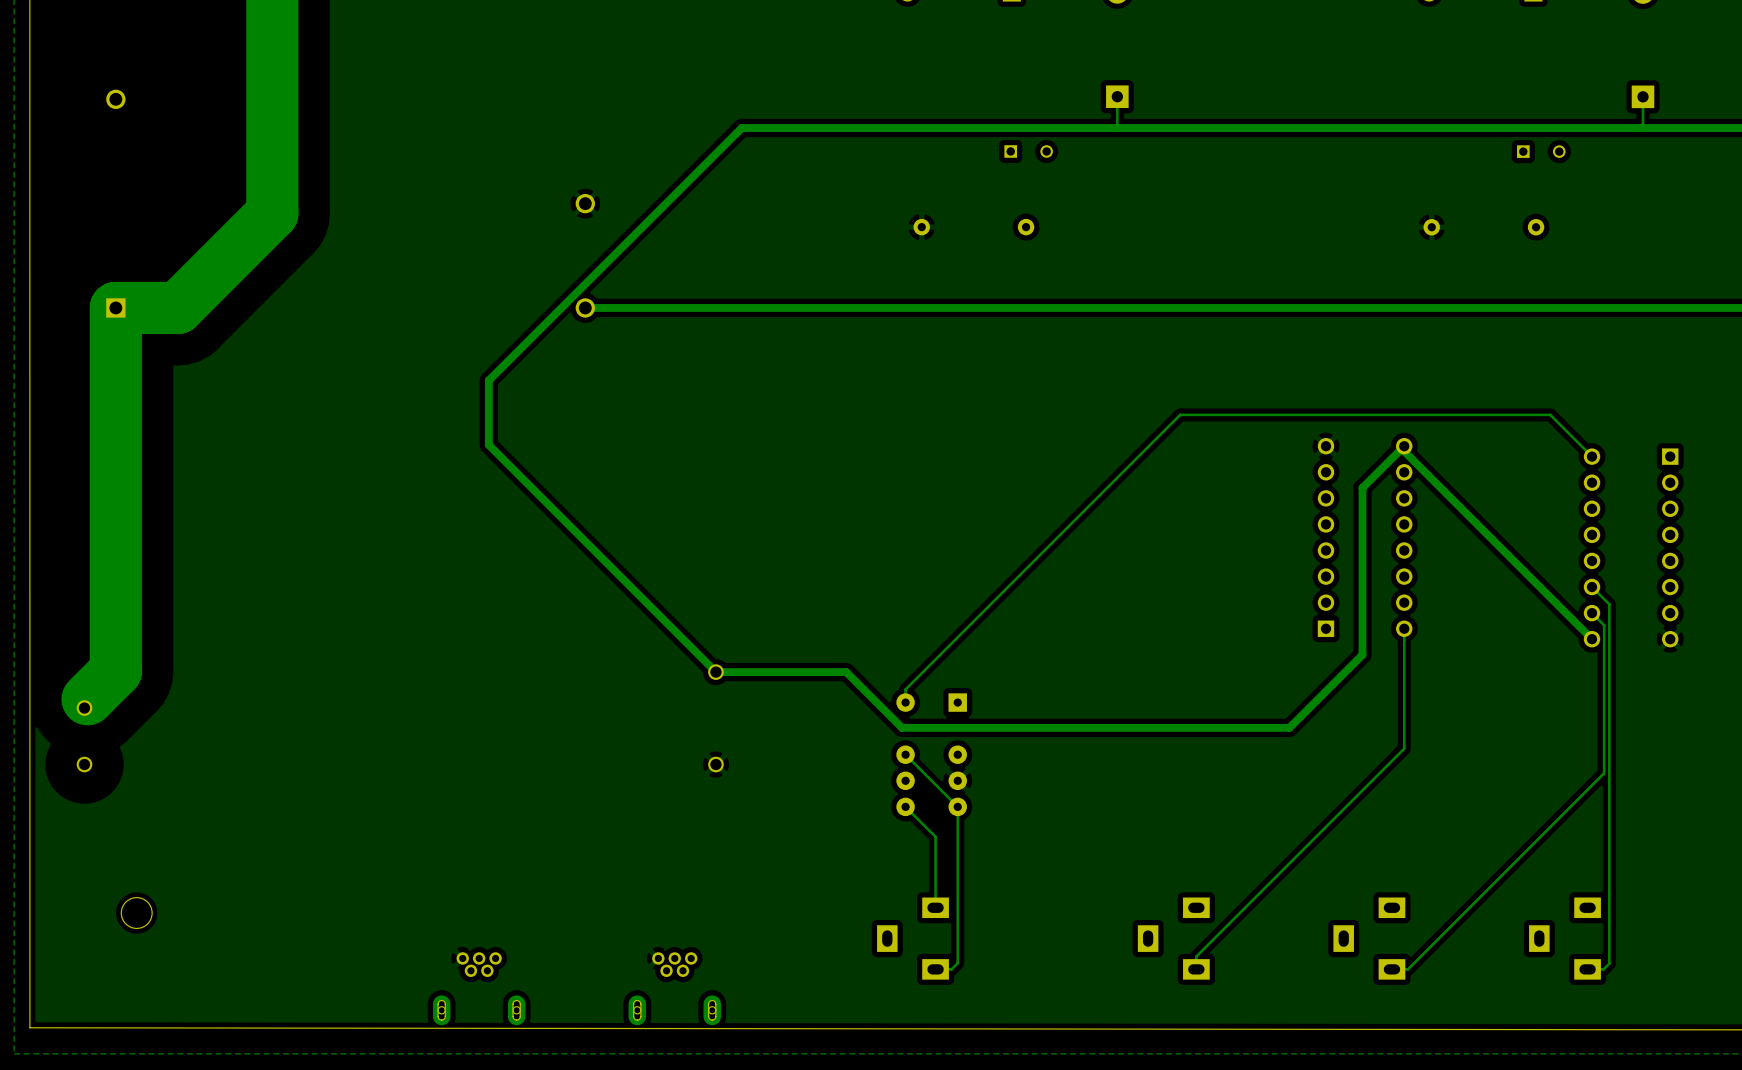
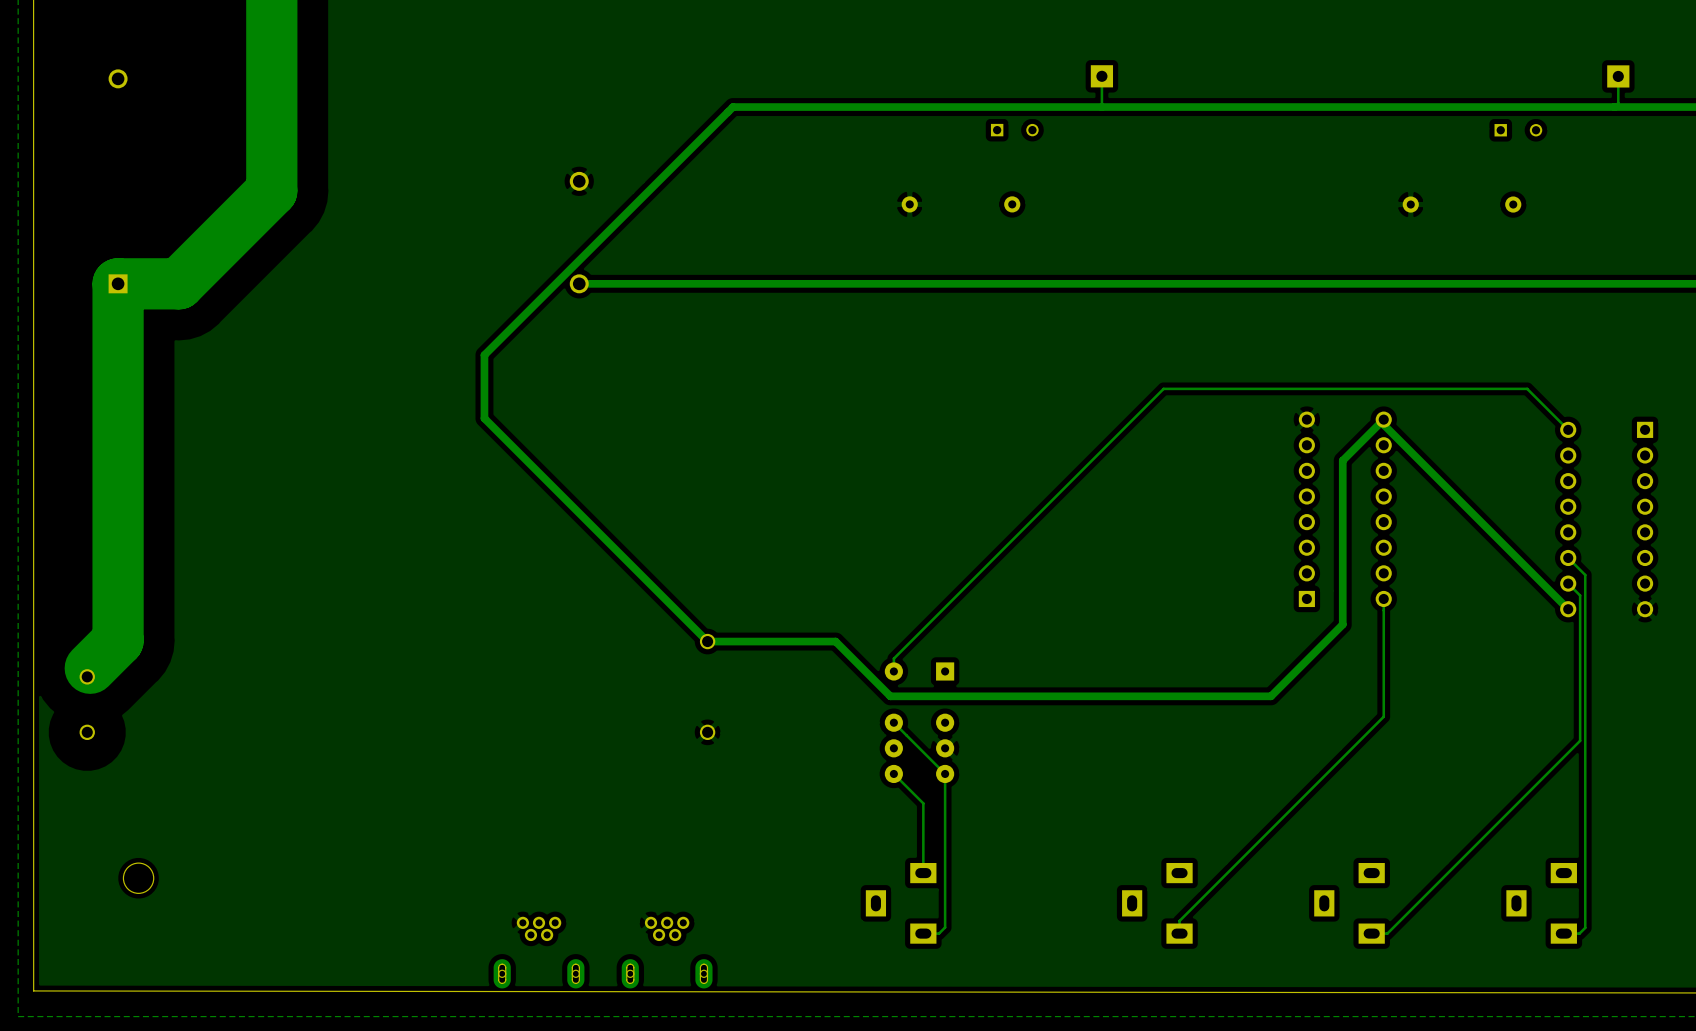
part position: (479, 988) -> (539, 952)

